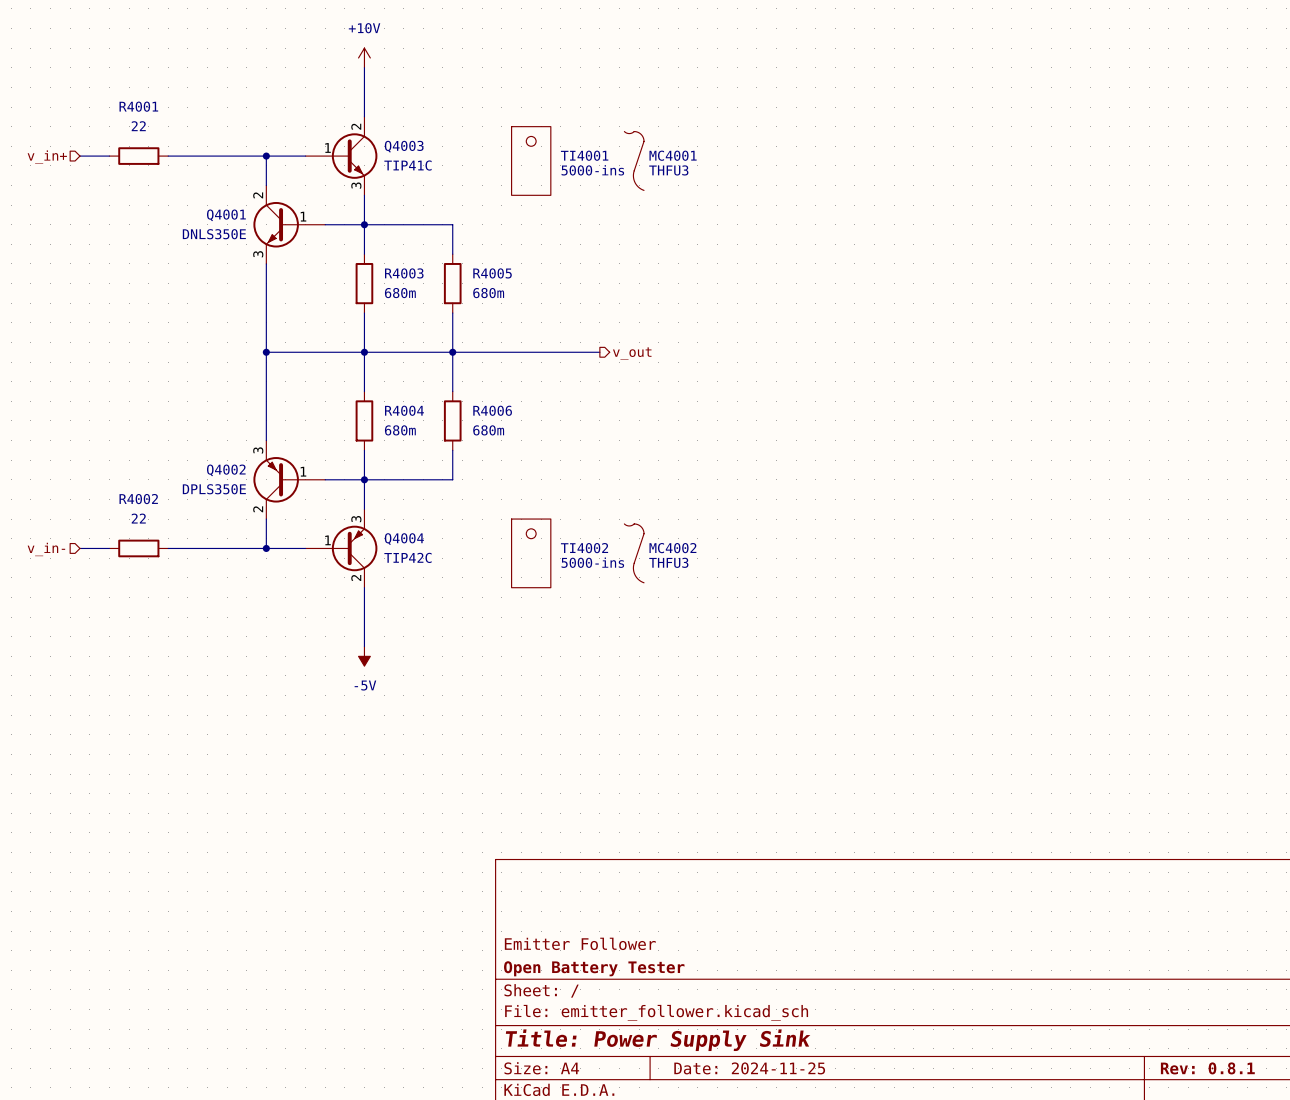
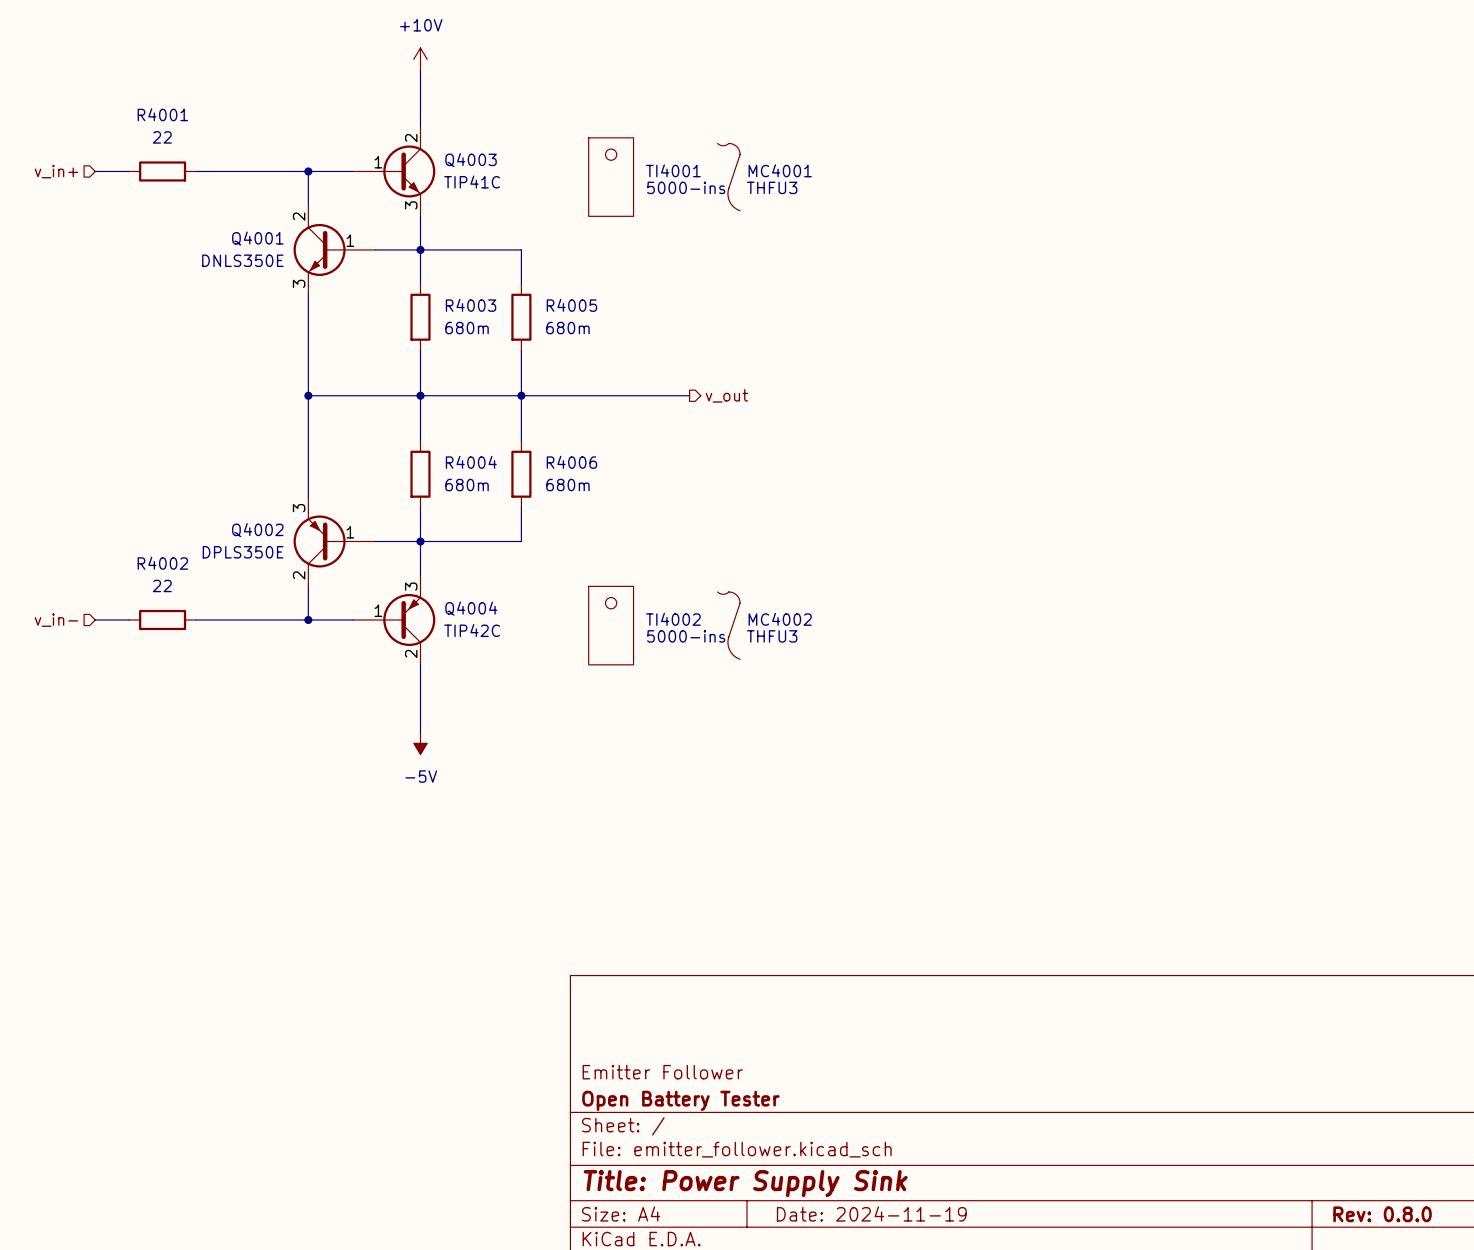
title block: Date: 2024-11-25 (749, 1068) -> Date: 2024-11-19 (871, 1214)
title block: Rev: 0.8.1 (1207, 1068) -> Rev: 0.8.0 (1382, 1214)

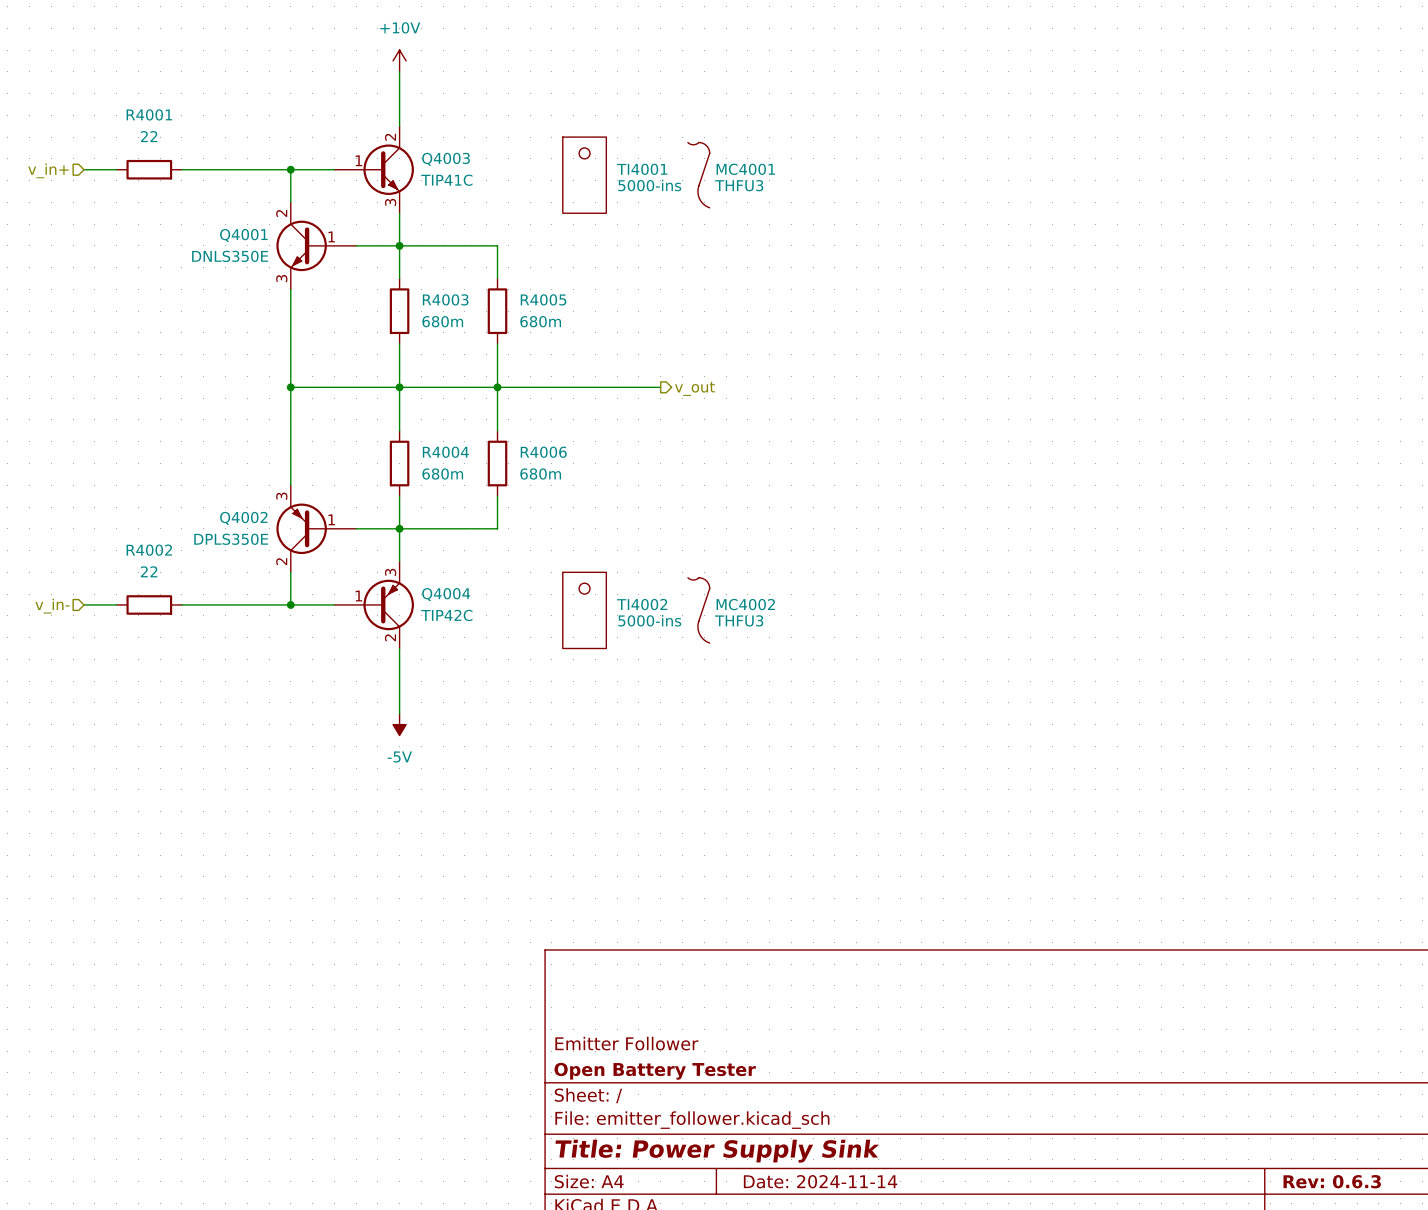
title block: Date: 2024-11-19 (871, 1214) -> Date: 2024-11-14 (820, 1181)
title block: Rev: 0.8.0 (1382, 1214) -> Rev: 0.6.3 (1332, 1181)

